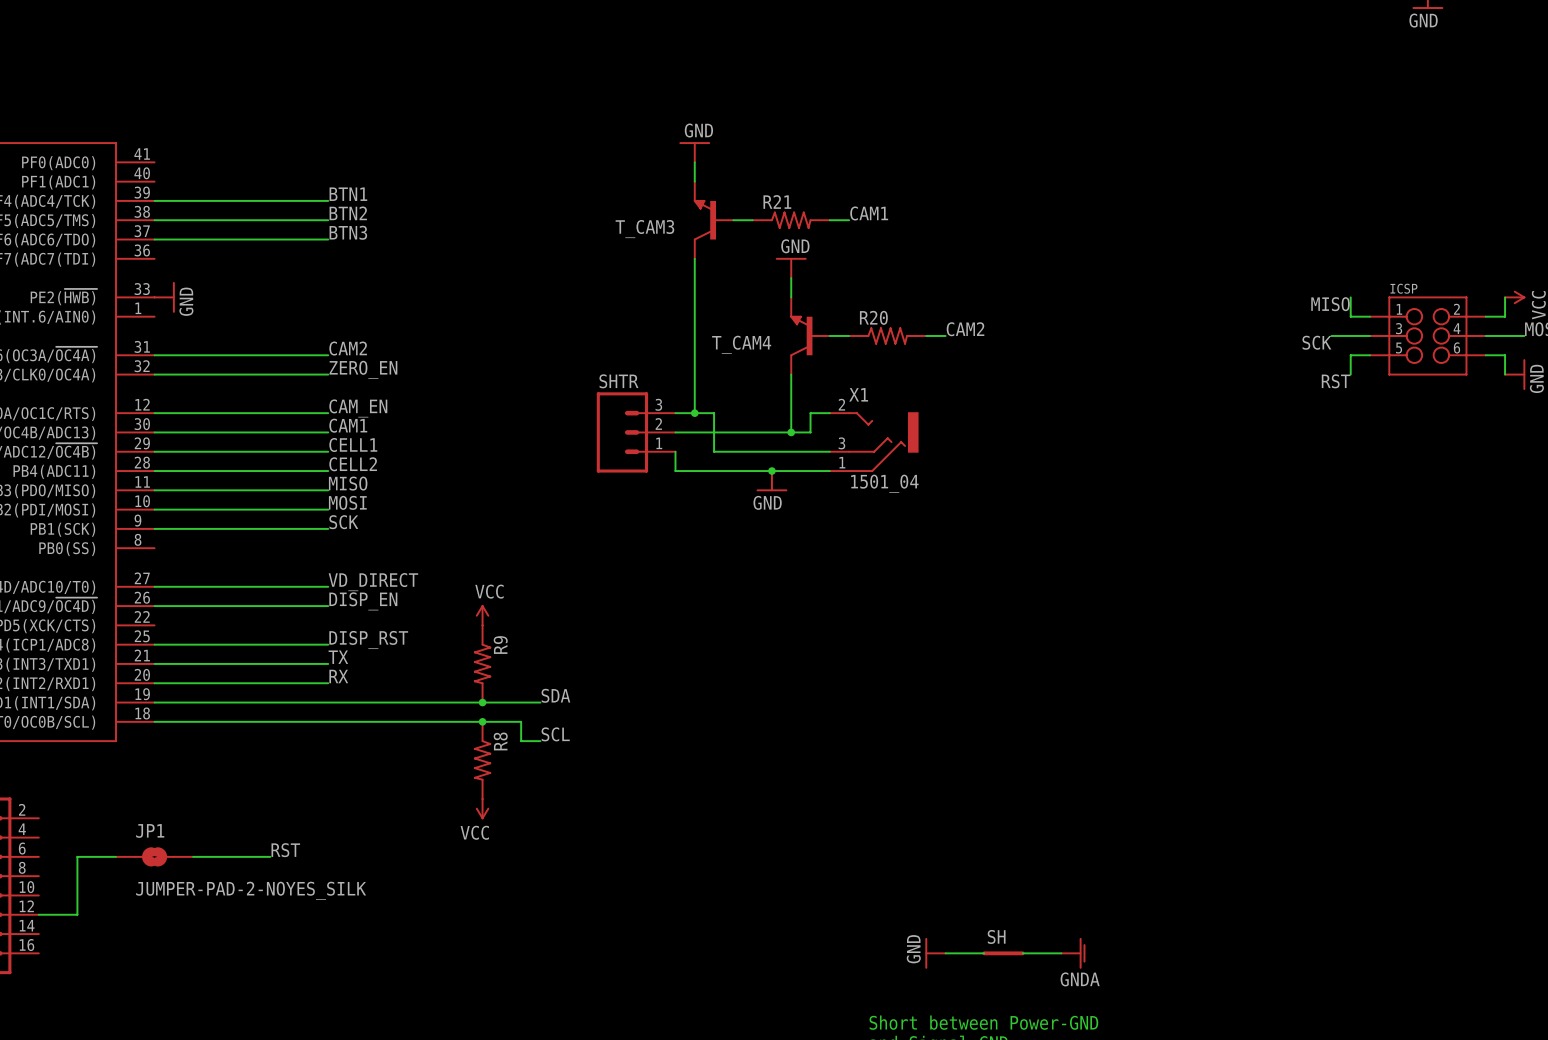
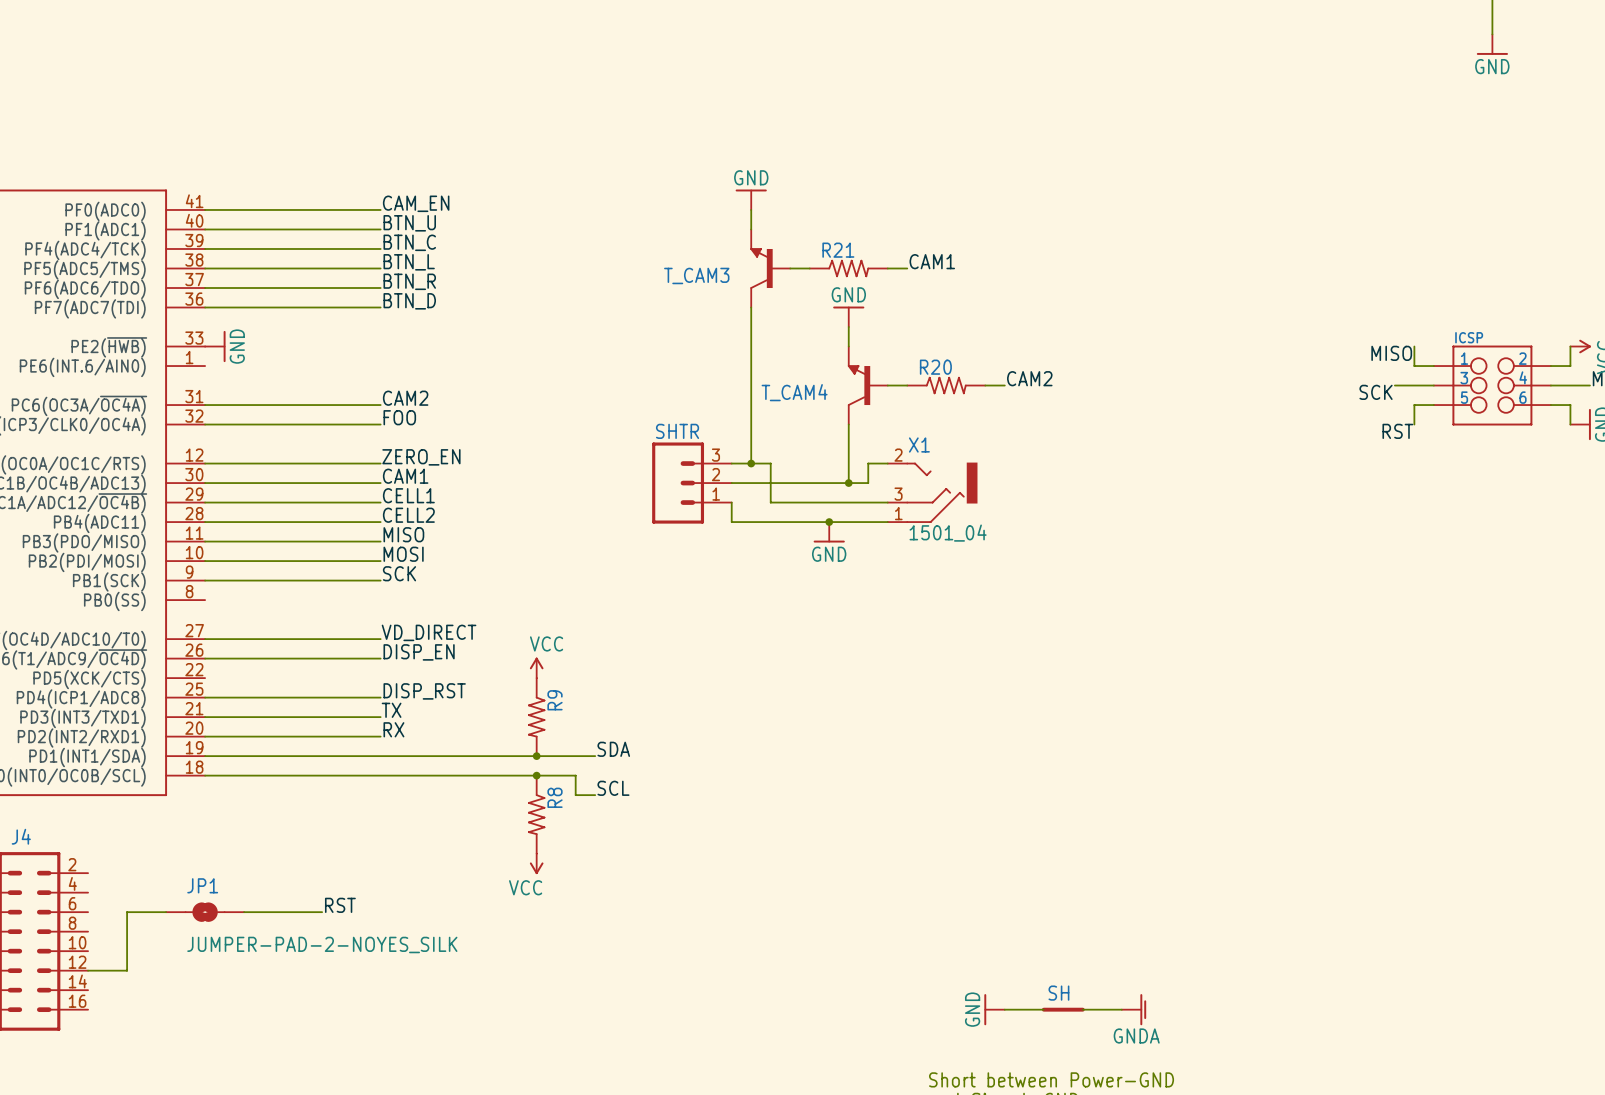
label: none -> CAM_EN (416, 203)
wire: none -> (205, 209) (380, 209)
label: none -> BTN_U (409, 223)
wire: none -> (205, 229) (380, 229)
label: BTN1 (348, 194) -> BTN_C (409, 242)
label: BTN2 (348, 213) -> BTN_L (409, 262)
label: BTN3 (348, 232) -> BTN_R (409, 281)
label: none -> BTN_D (409, 301)
wire: none -> (205, 307) (380, 307)
label: ZERO_EN (363, 369) -> FOO (399, 417)
label: CAM_EN (358, 408) -> ZERO_EN (421, 457)

